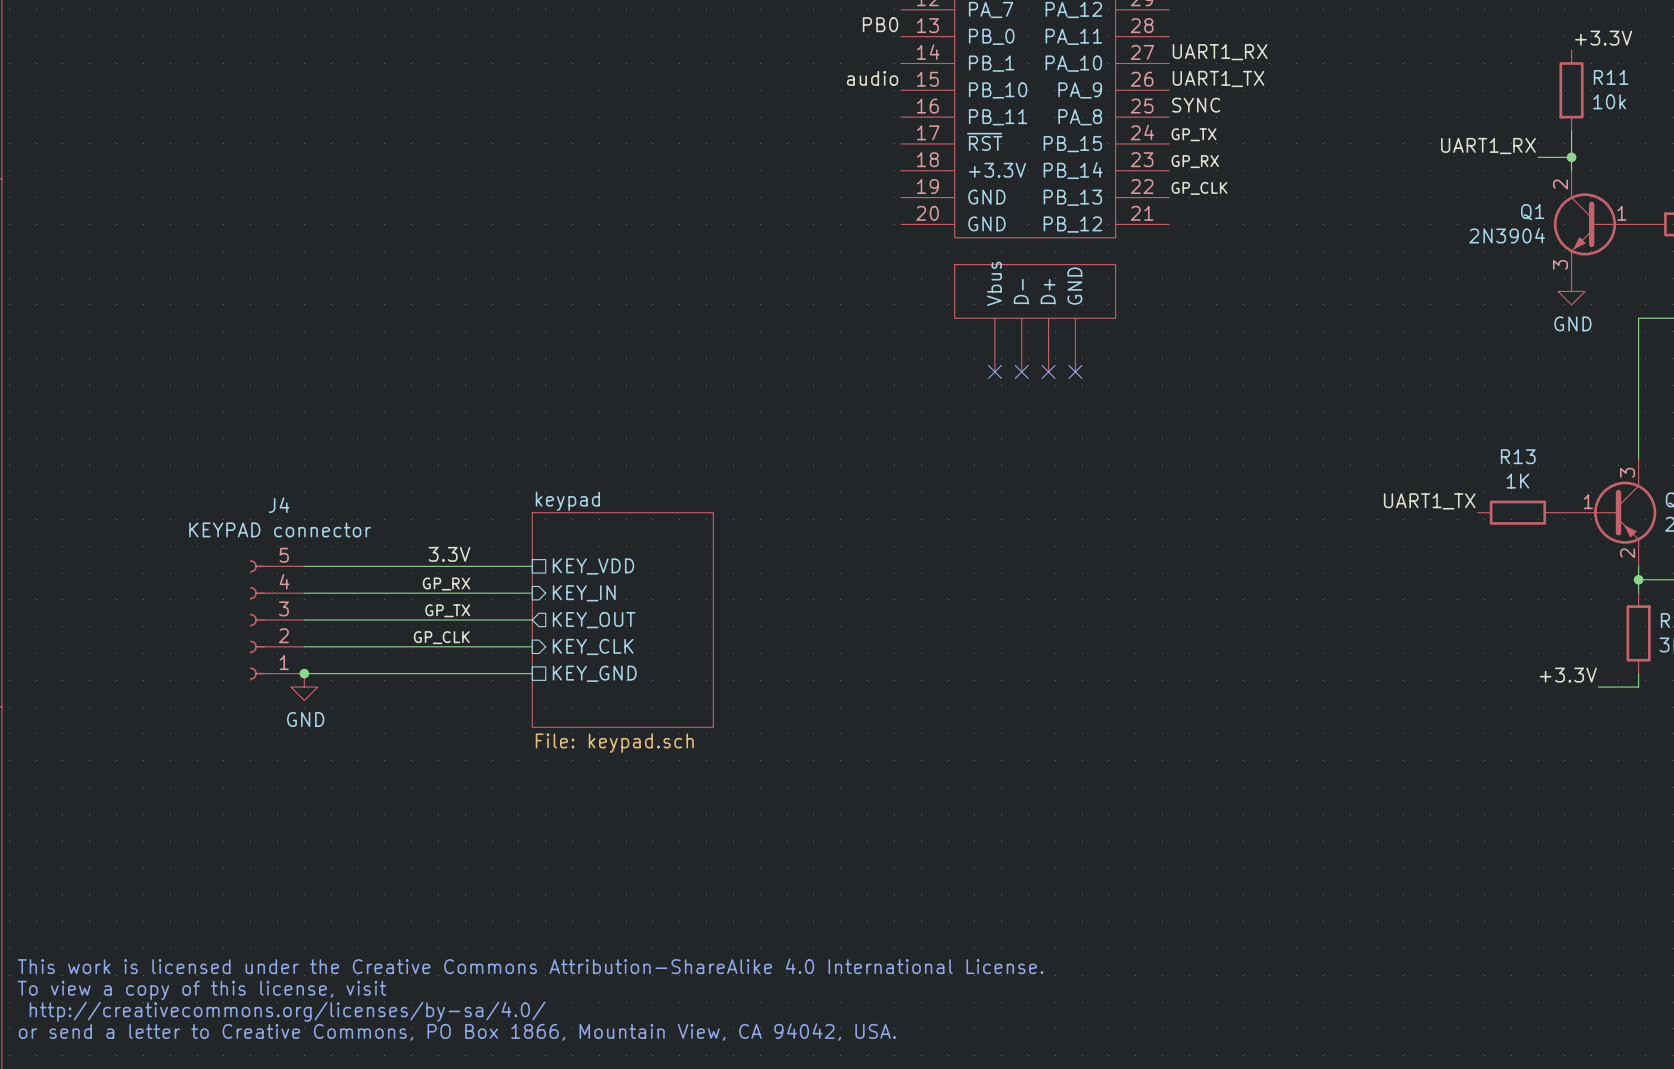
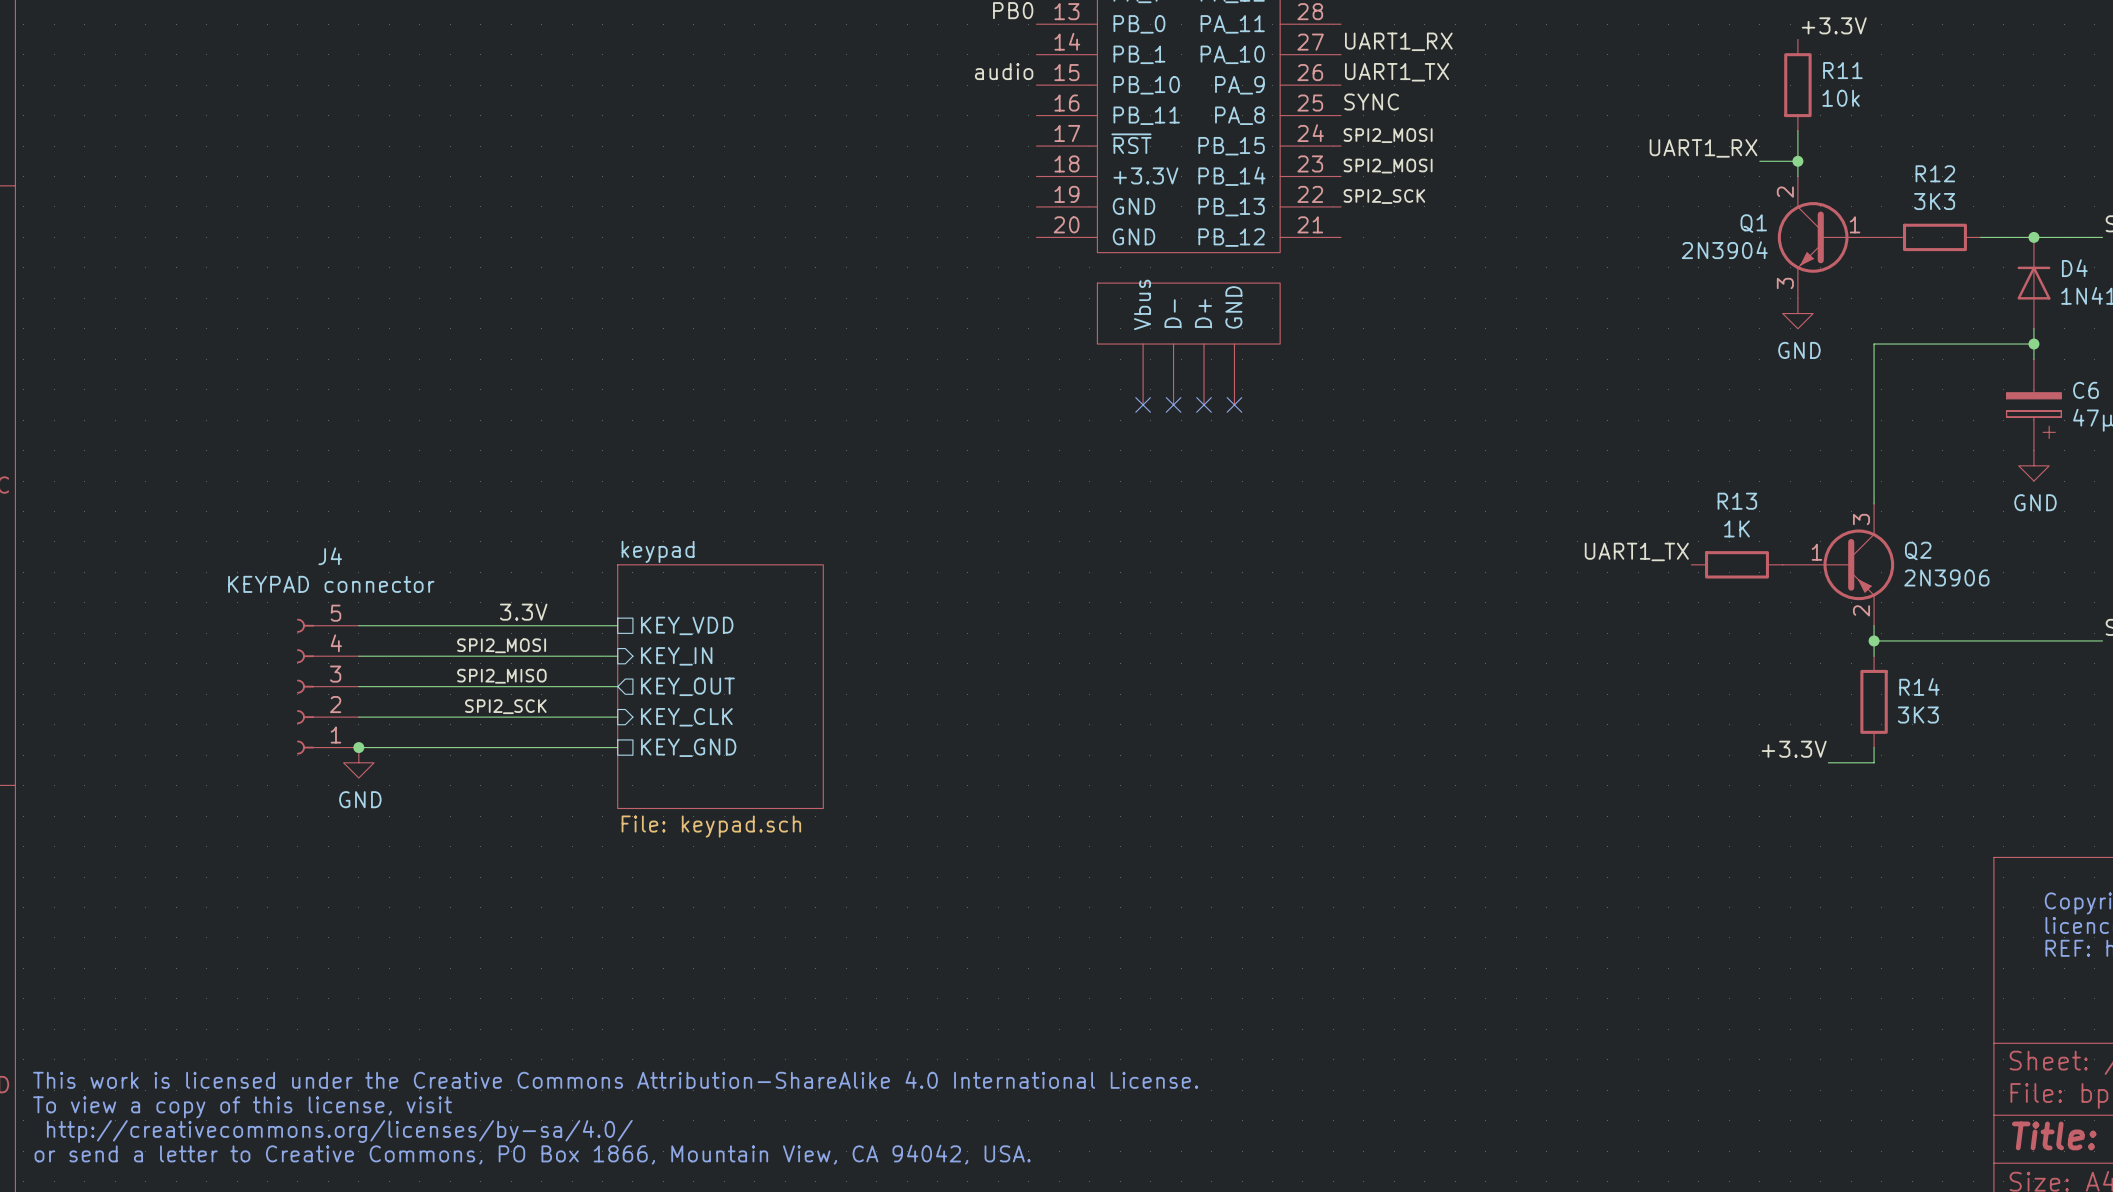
label: GP_TX (1193, 134) -> SPI2_MOSI (1388, 135)
label: GP_RX (1195, 161) -> SPI2_MOSI (1388, 166)
label: GP_CLK (1199, 188) -> SPI2_SCK (1384, 196)
label: GP_RX (446, 583) -> SPI2_MOSI (501, 645)
label: GP_TX (447, 610) -> SPI2_MISO (501, 676)
label: GP_CLK (441, 637) -> SPI2_SCK (505, 706)

